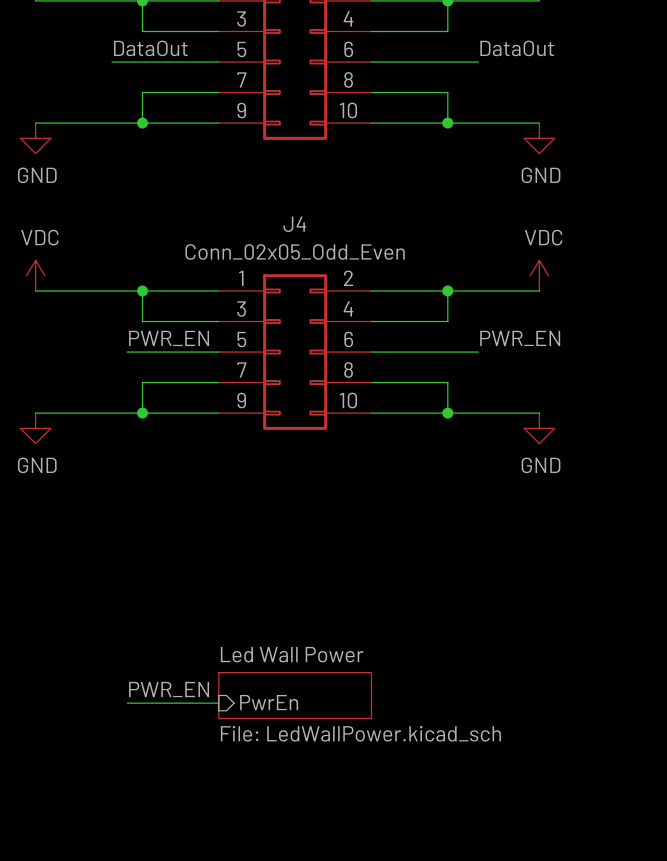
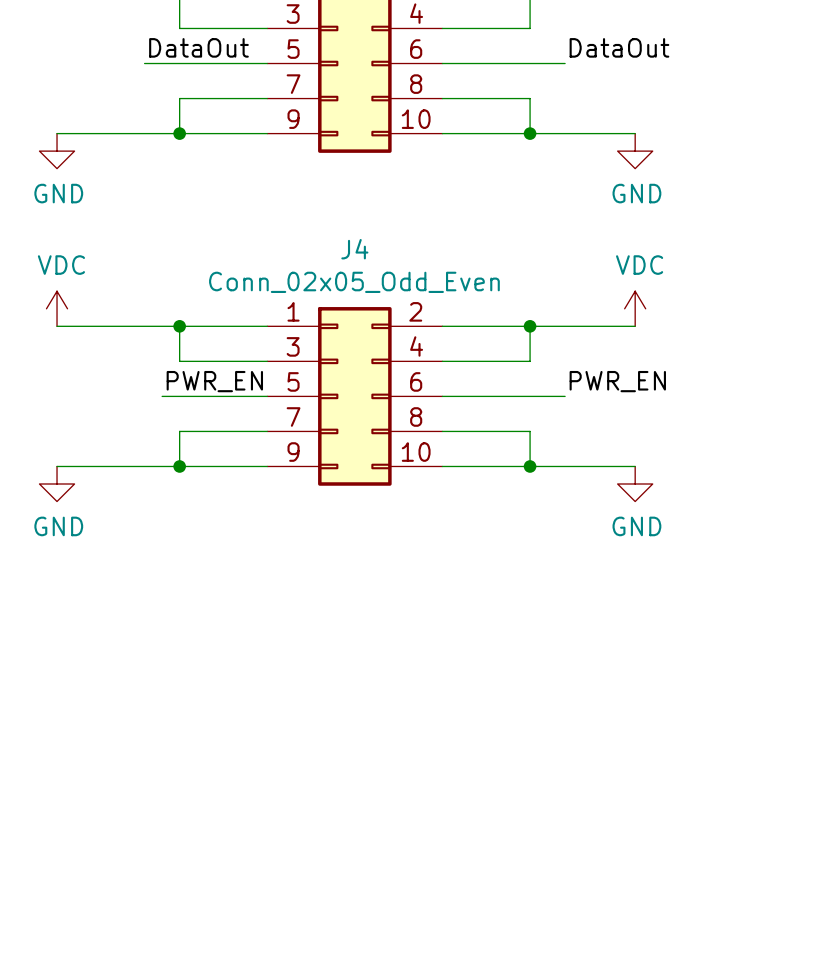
label: PWR_EN (169, 689) -> none
sheet Led Wall Power: File: LedWallPower.kicad_sch (295, 695) -> none
sheet pin: PwrEn (269, 702) -> none
wire: (127, 703) (218, 703) -> none

